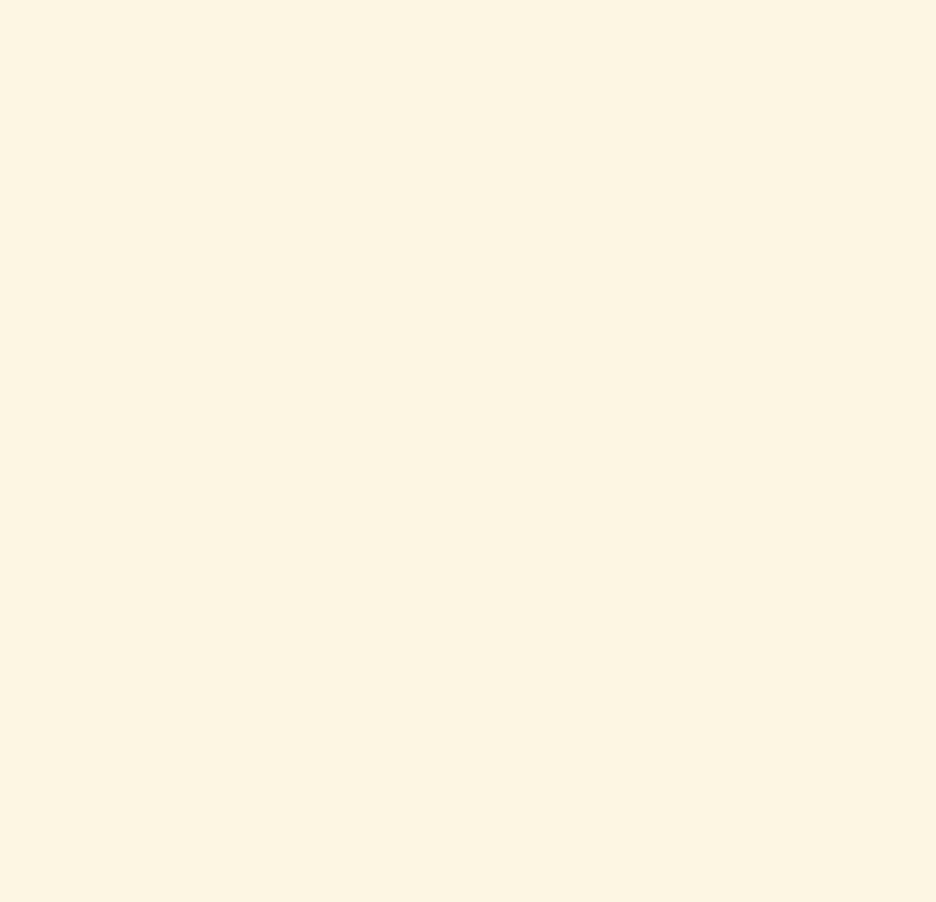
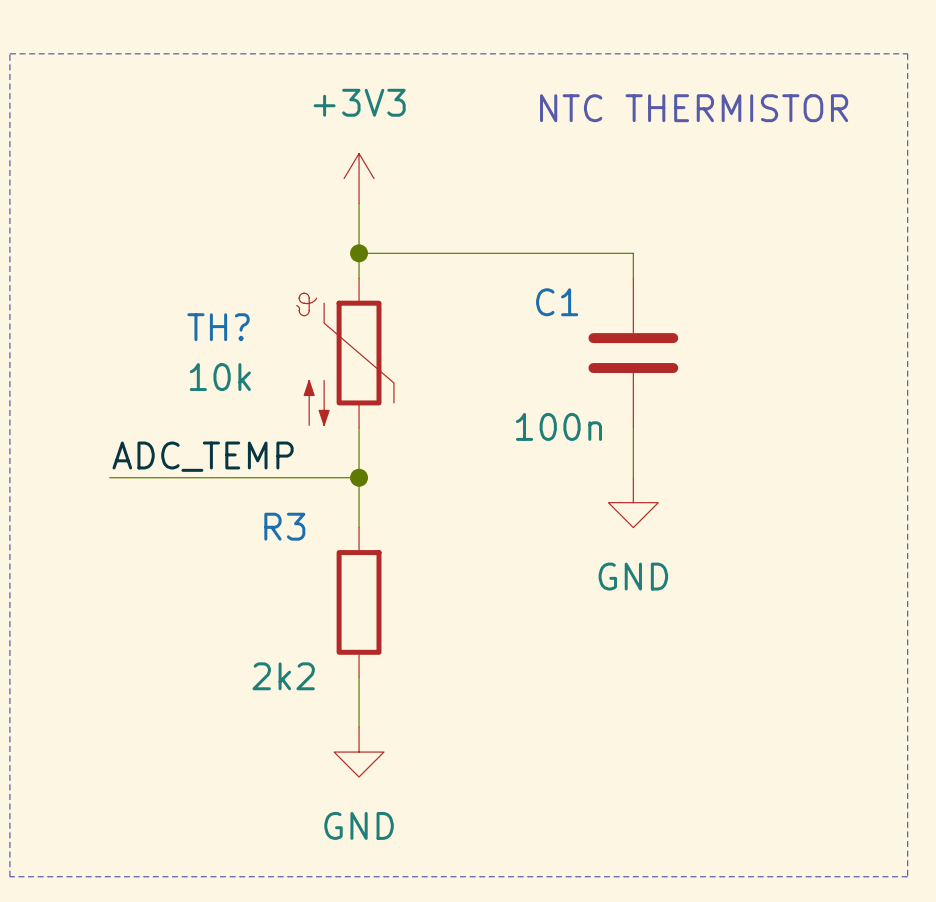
line: none -> (9, 53) (907, 53) (907, 876) (9, 876) (9, 53)
text: none -> NTC THERMISTOR (694, 108)
power symbol: none -> +3V3 (359, 178)
wire: none -> (359, 203) (359, 278)
wire: none -> (359, 253) (633, 253) (633, 278)
junction: none -> (359, 253)
TH?: none -> 10k (345, 353)
C1: none -> 100n (633, 353)
wire: none -> (359, 427) (359, 527)
wire: none -> (633, 427) (633, 477)
label: none -> ADC_TEMP (203, 456)
wire: none -> (109, 477) (359, 477)
junction: none -> (359, 477)
power symbol: none -> GND (633, 502)
R3: none -> 2k2 (359, 602)
wire: none -> (359, 677) (359, 727)
power symbol: none -> GND (359, 752)

